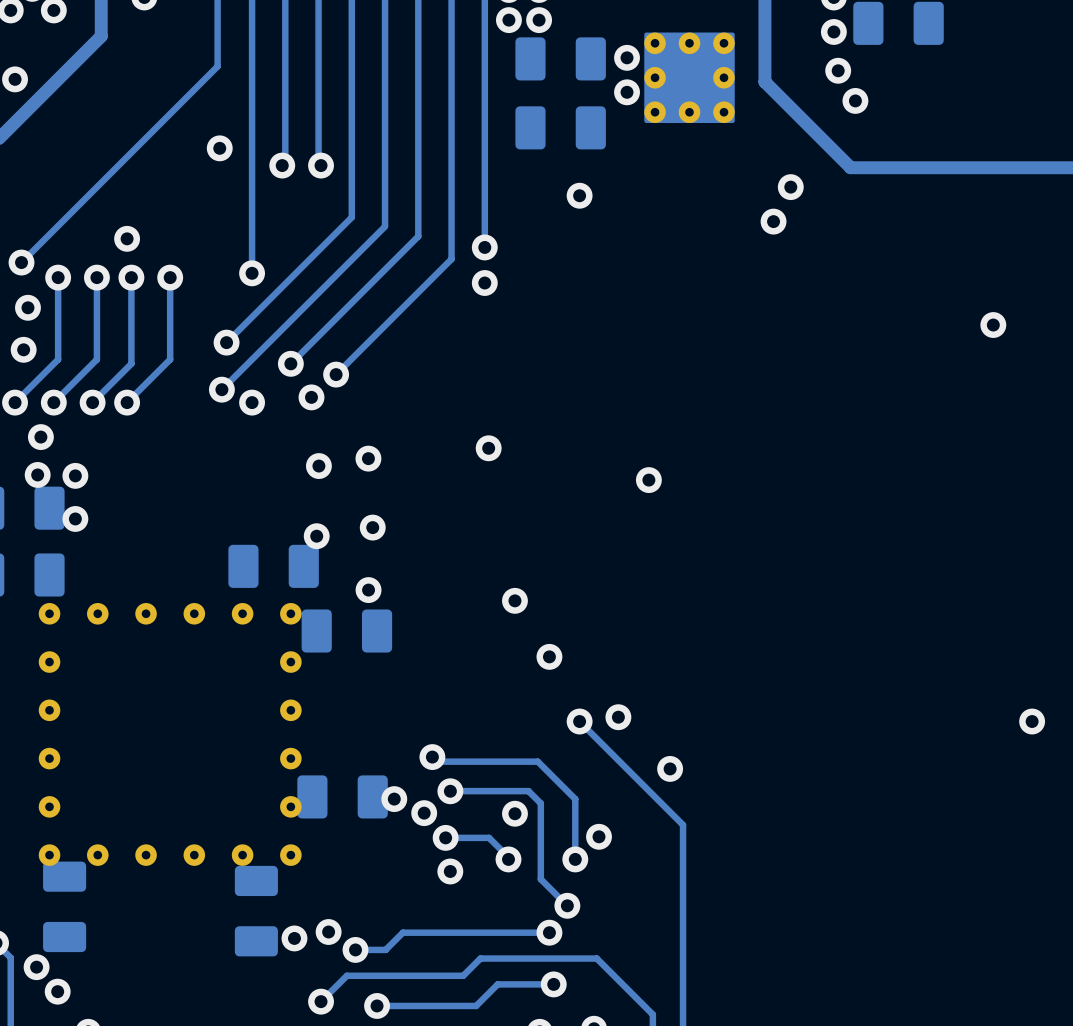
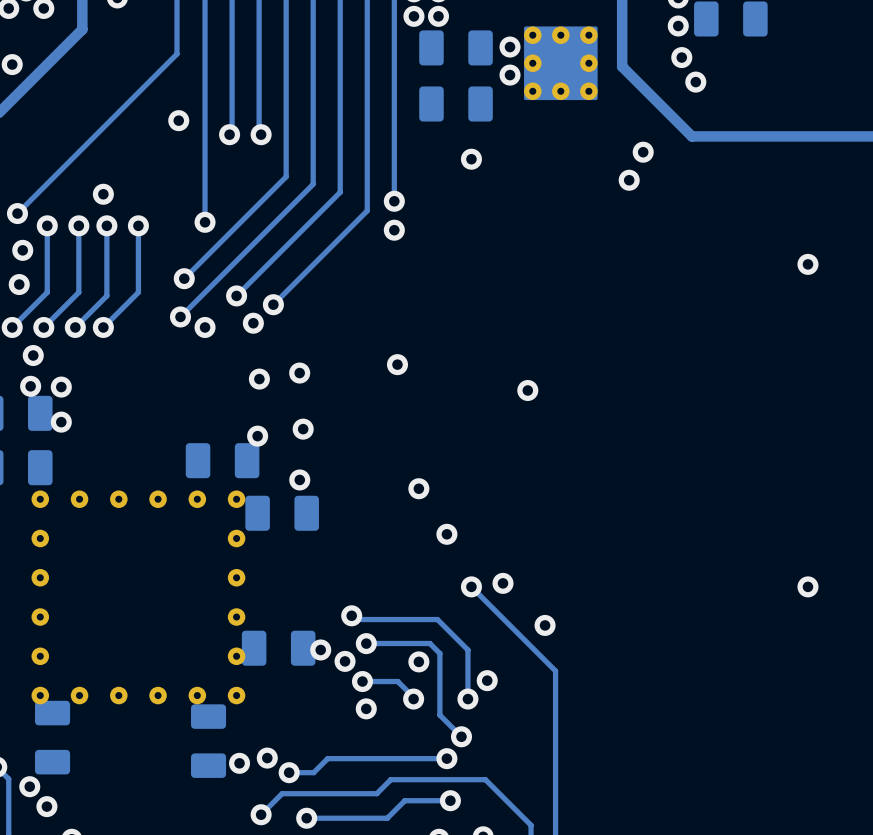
via: none -> (807, 586)
via: (1032, 721) -> none

